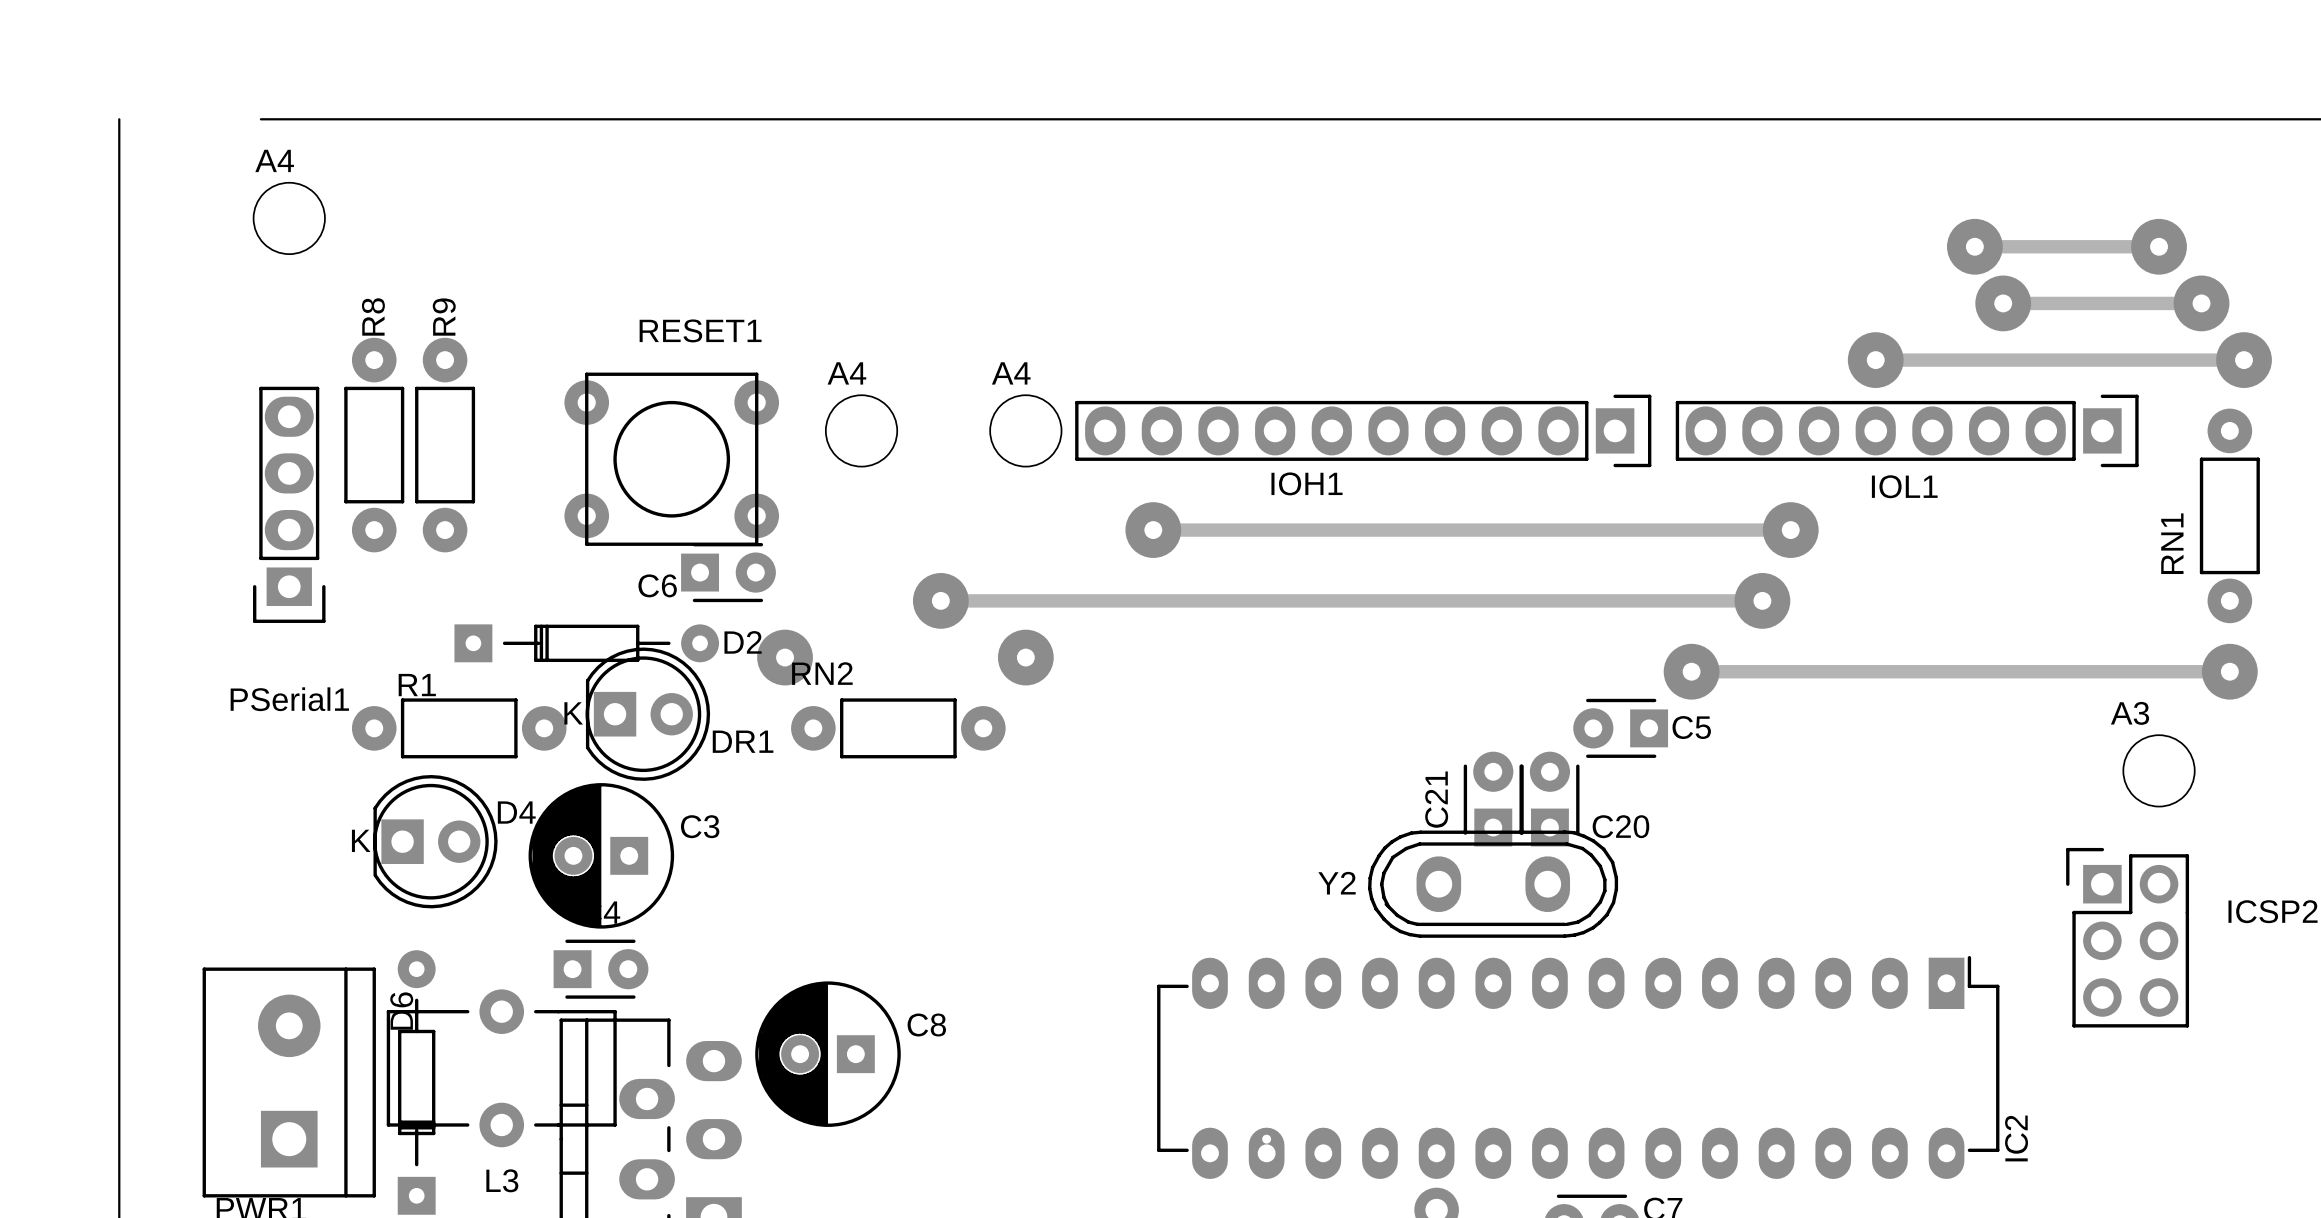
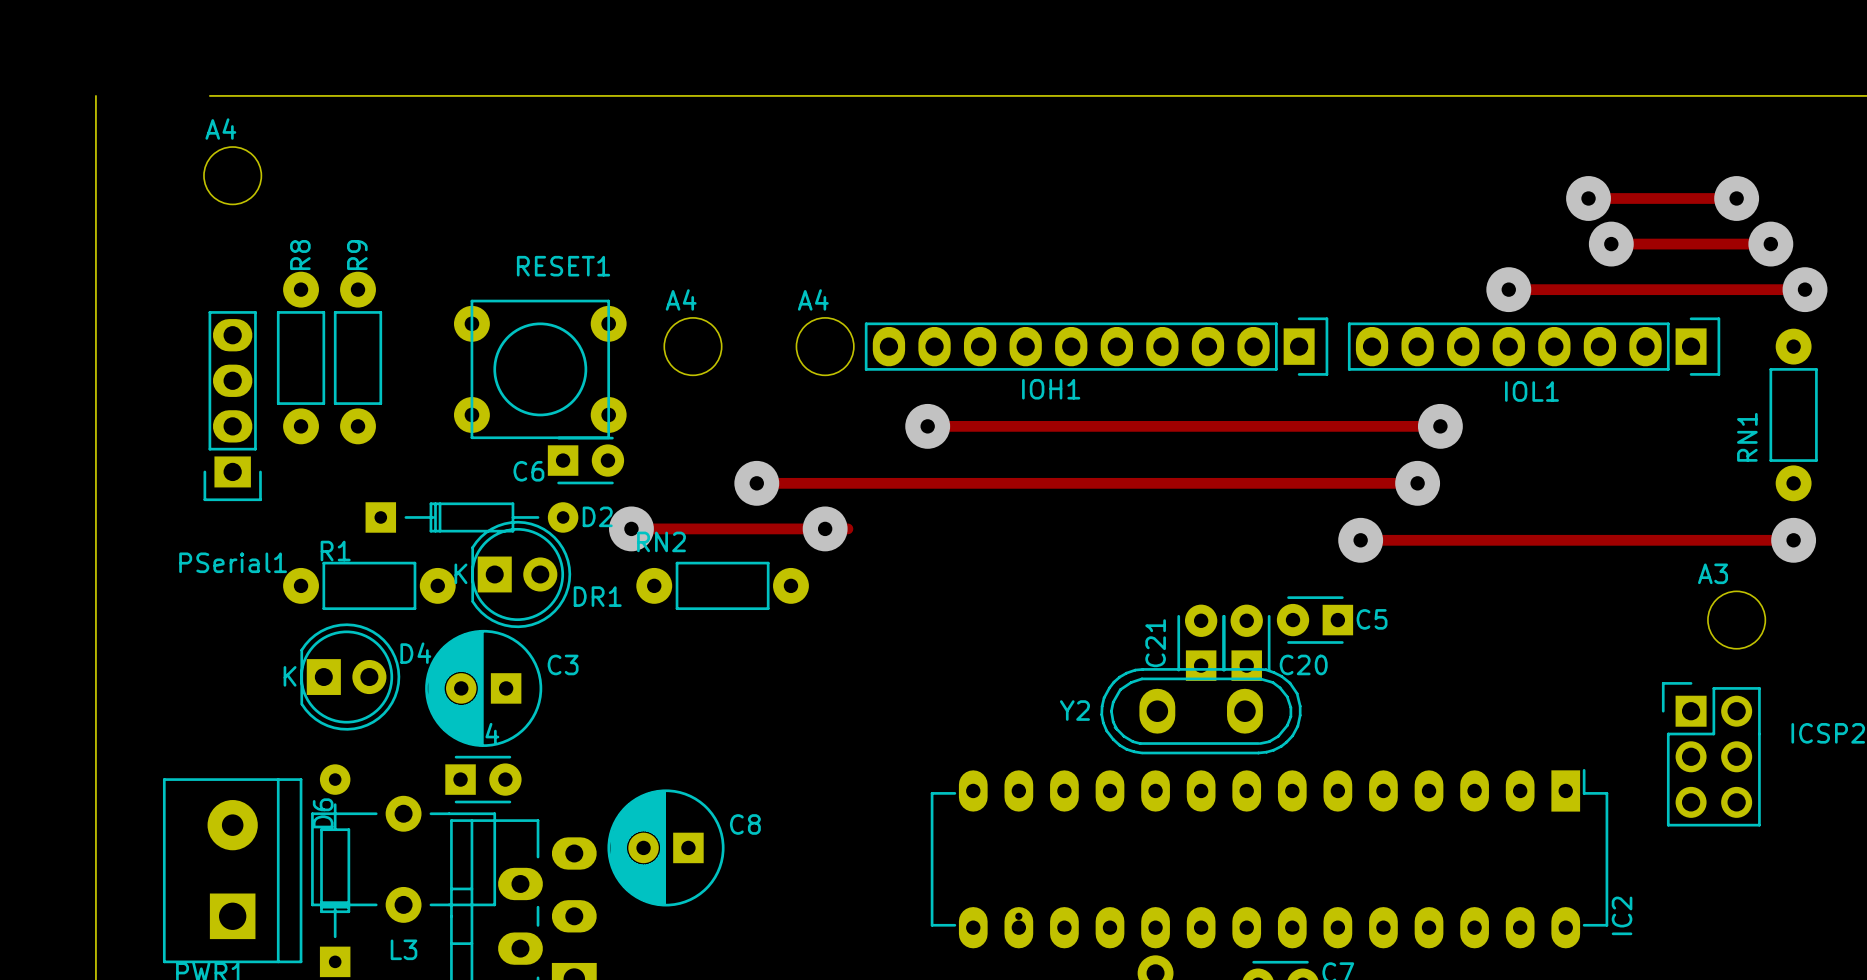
track: none -> (631, 528) (847, 528)
C5 position: (1620, 728) -> (1314, 620)

